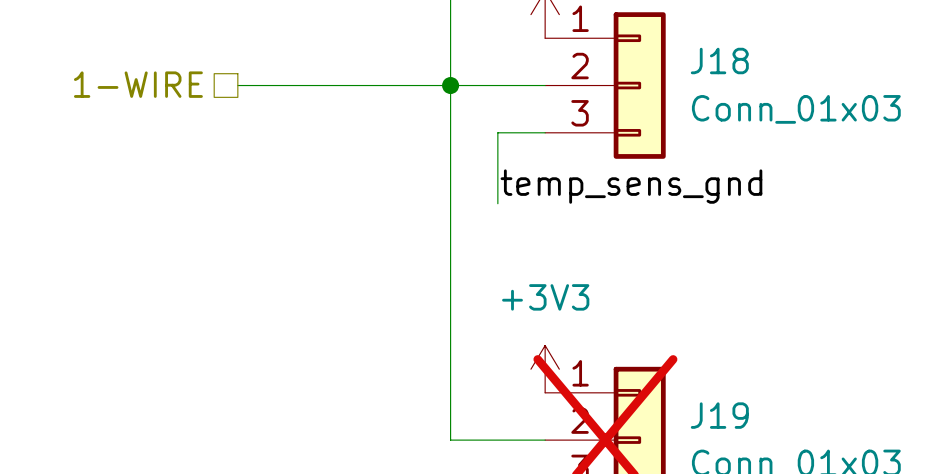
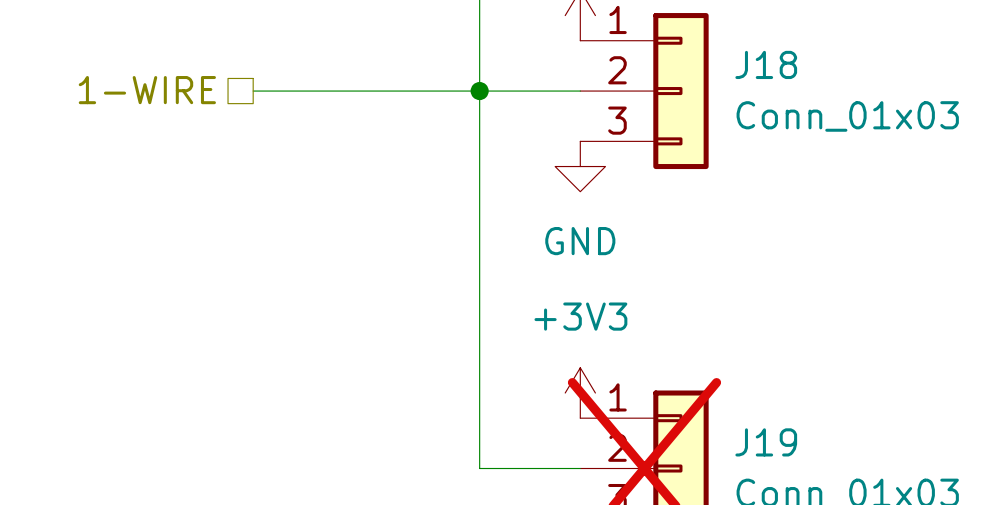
wire: (545, 132) (497, 132) (497, 203) -> none
power symbol: none -> GND (580, 166)
label: temp_sens_gnd (631, 186) -> none

